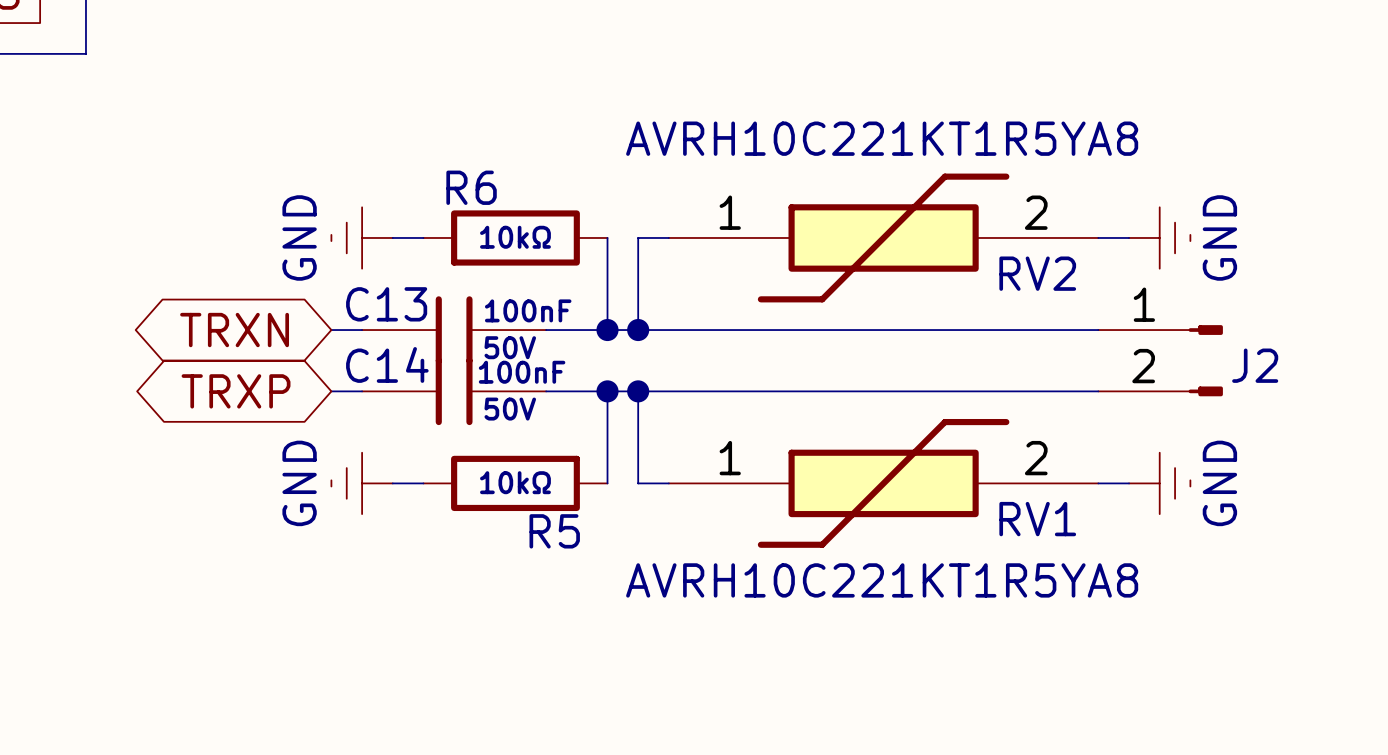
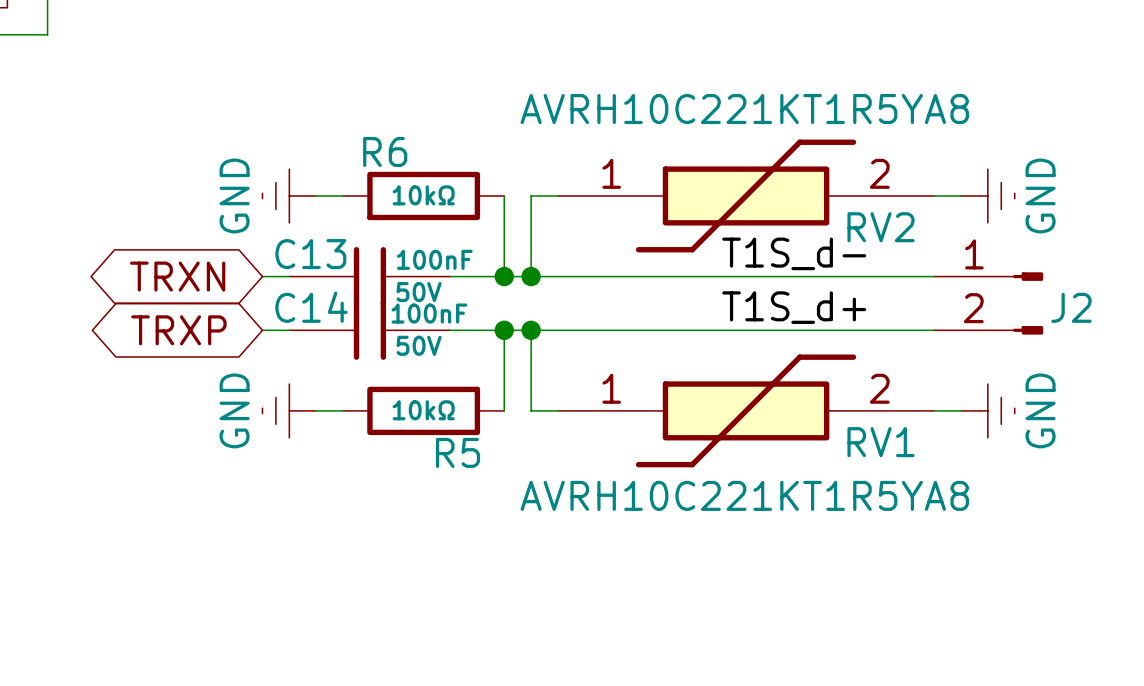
label: none -> T1S_d- (794, 253)
label: none -> T1S_d+ (794, 307)

